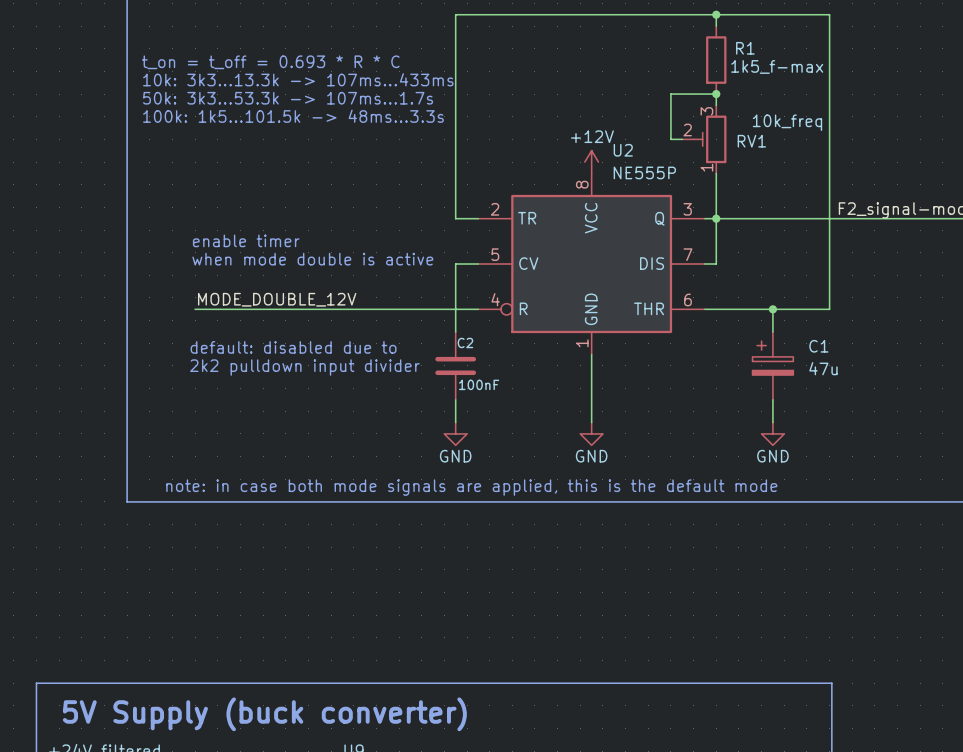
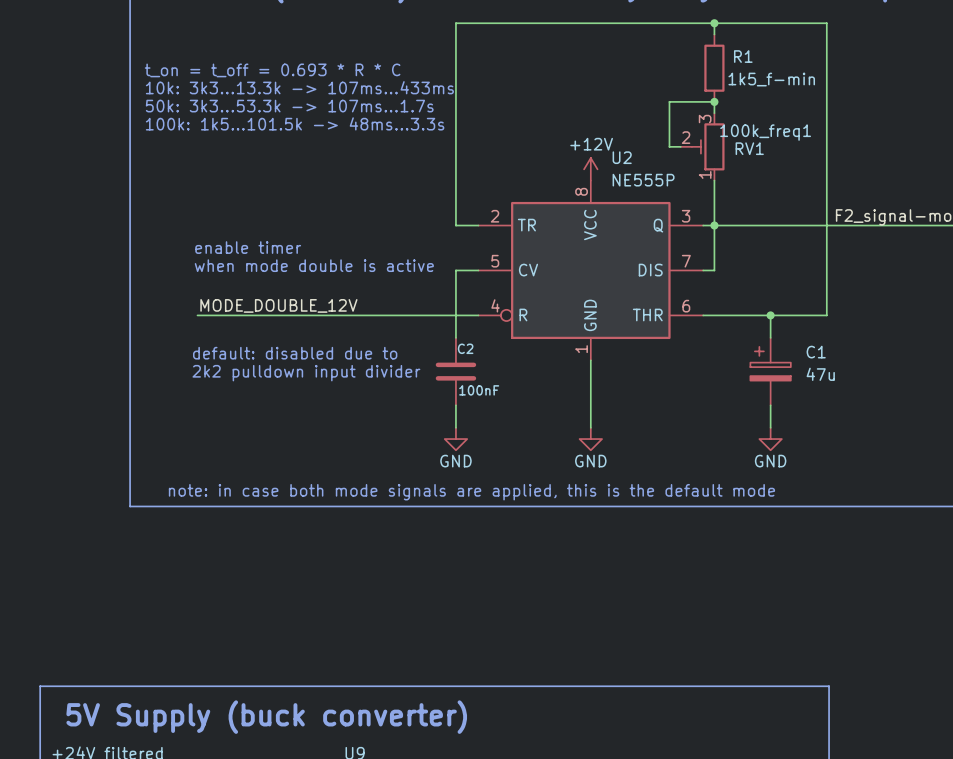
R1 value: 1k5_f-max (777, 66) -> 1k5_f-min (771, 79)
RV1 value: 10k_freq (787, 122) -> 100k_freq1 (765, 132)

